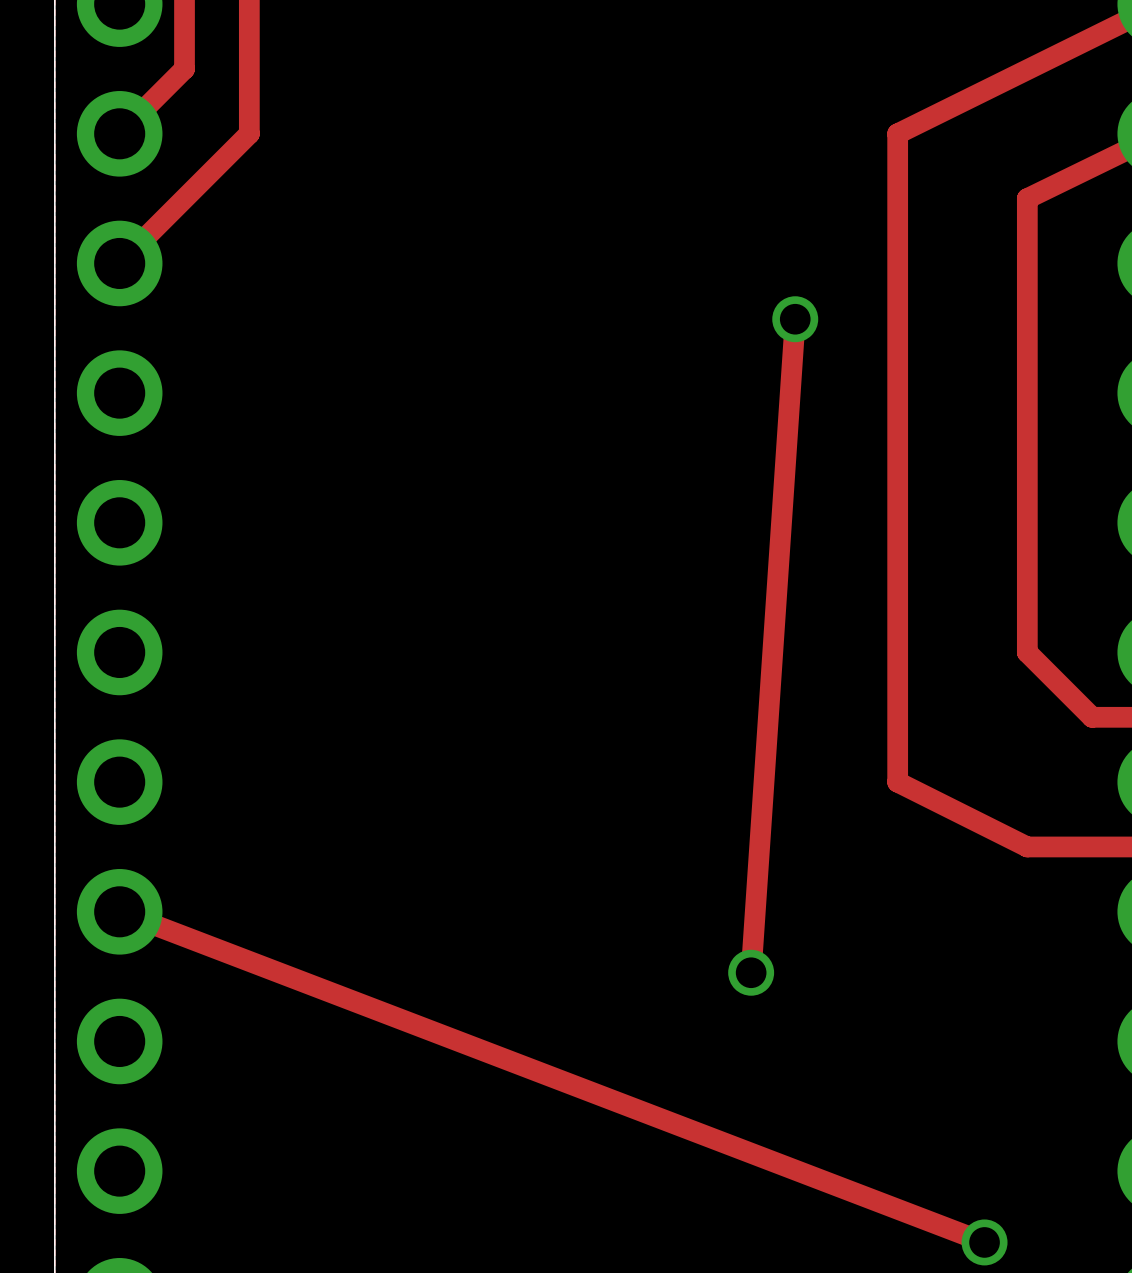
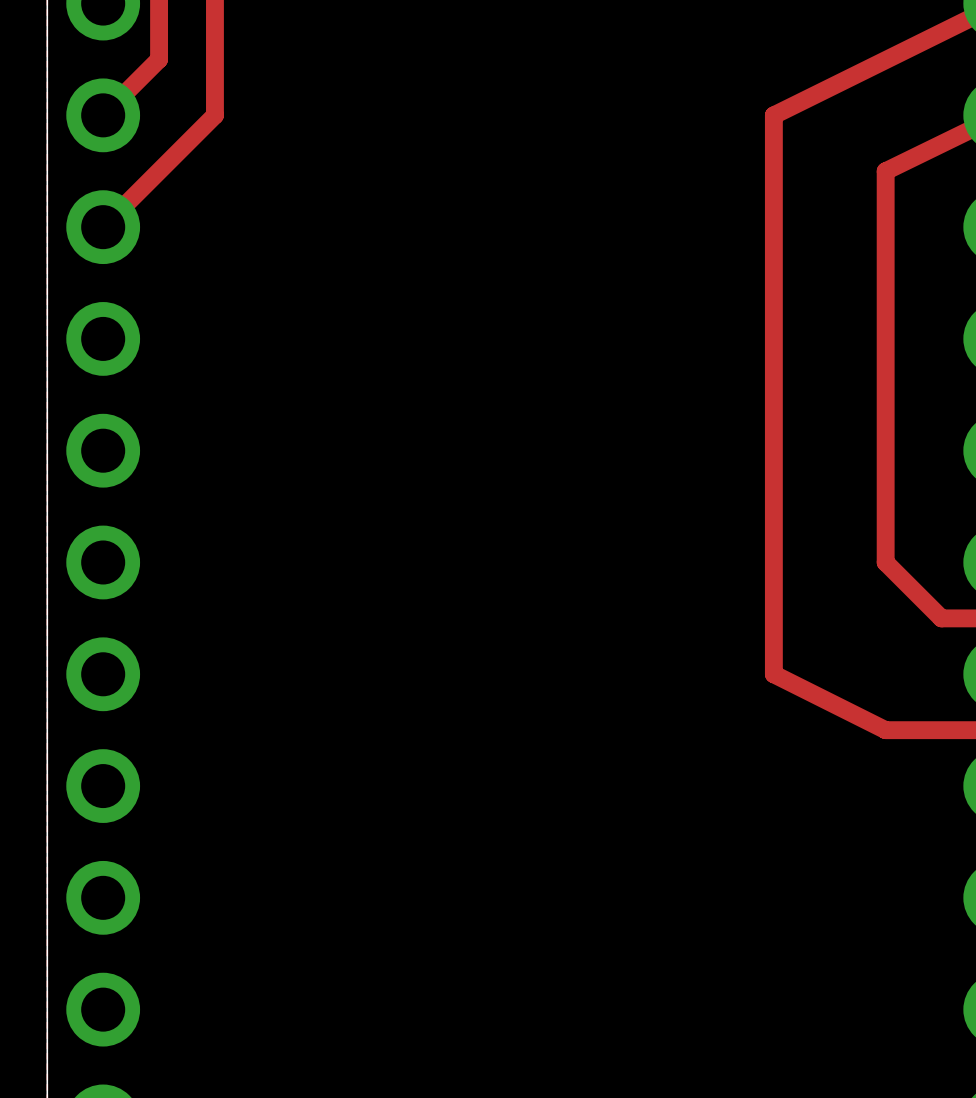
track: (795, 319) (751, 972) -> none
via: (795, 319) -> none
track: (119, 911) (984, 1242) -> none
via: (751, 972) -> none
via: (984, 1242) -> none

